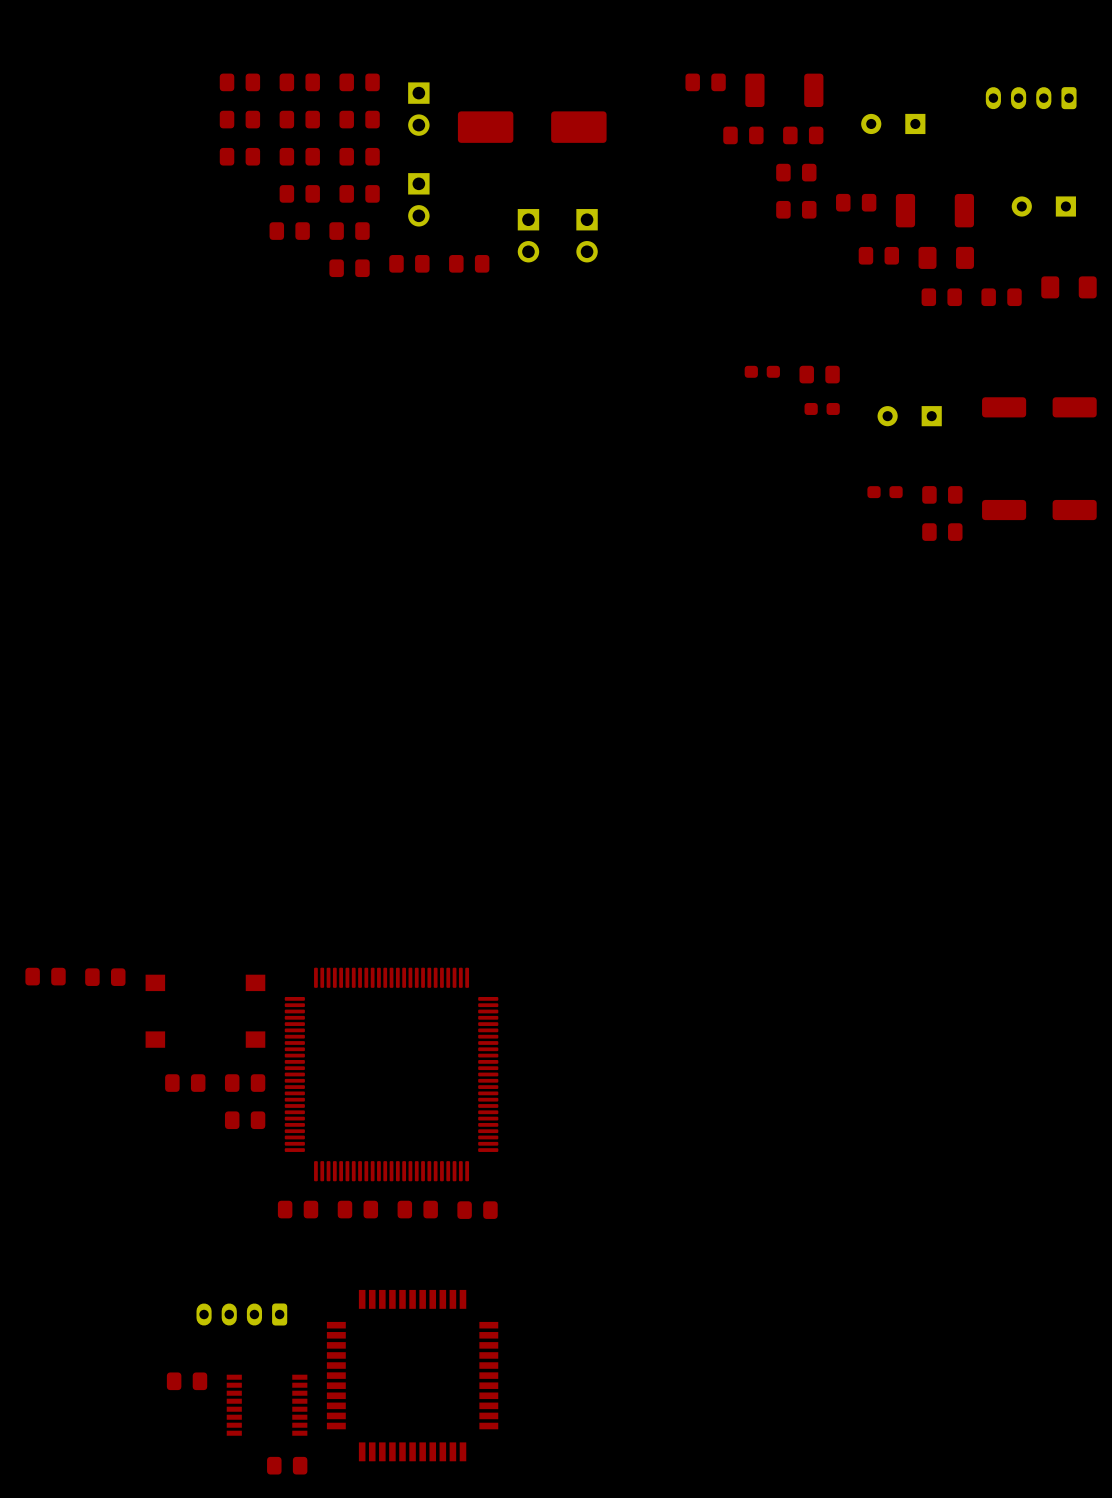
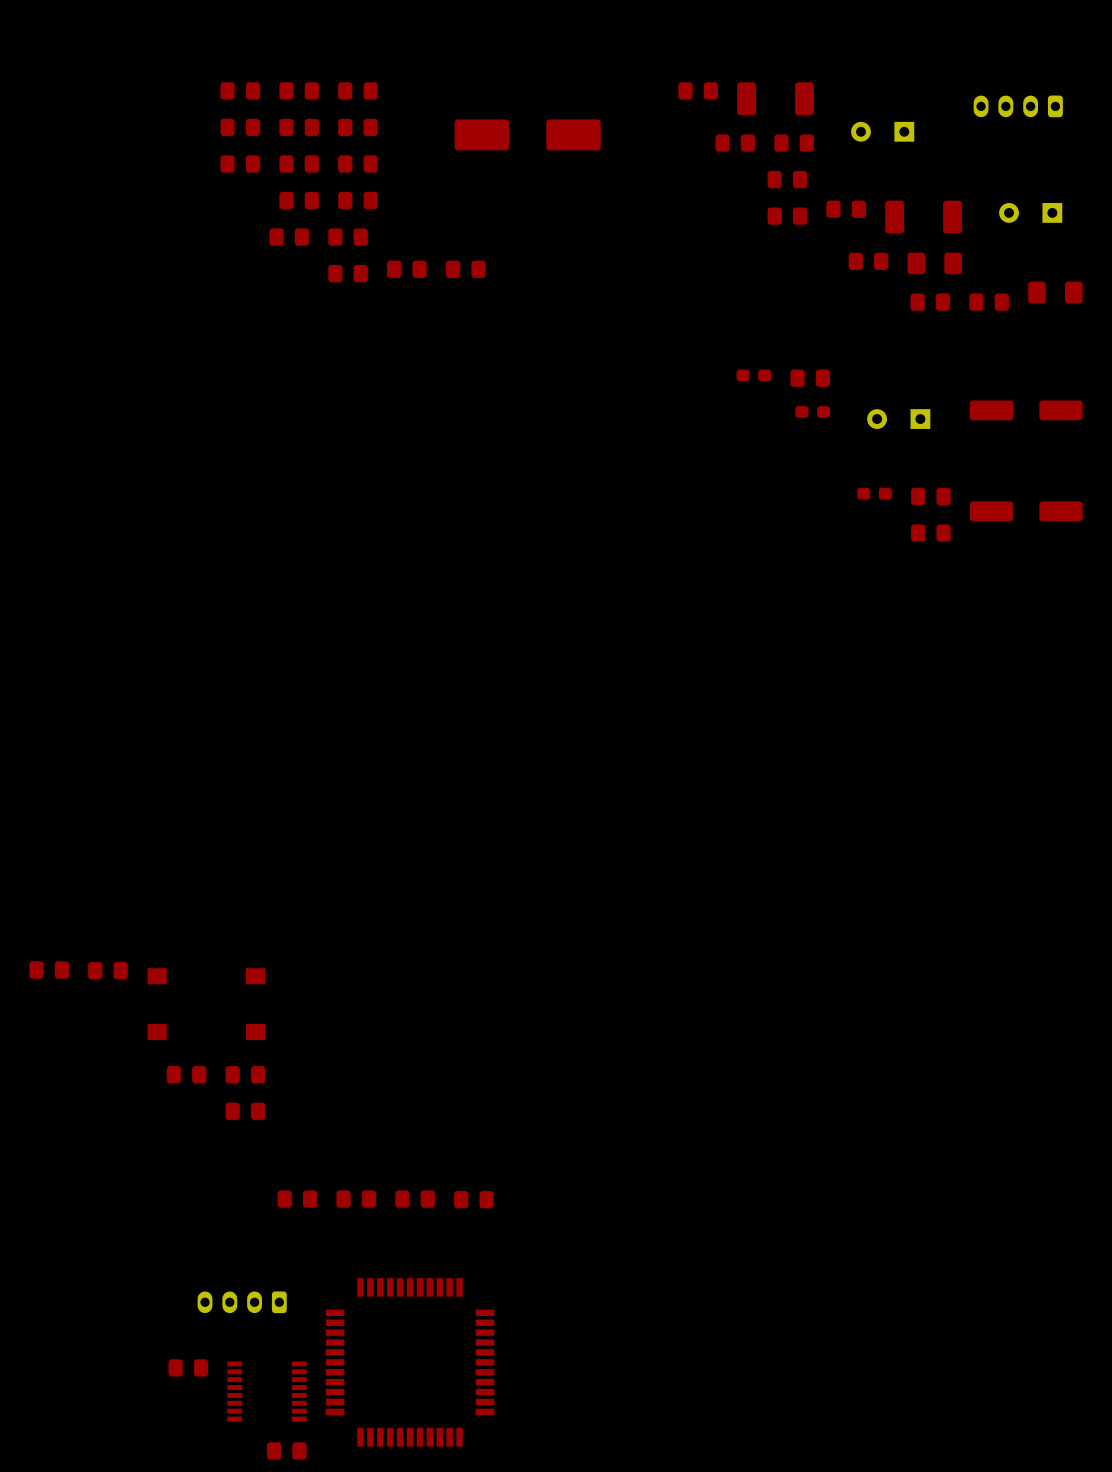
part: (418, 109) -> none
part: (418, 199) -> none
part: (528, 235) -> none
part: (587, 235) -> none
part: (391, 1074) -> none

